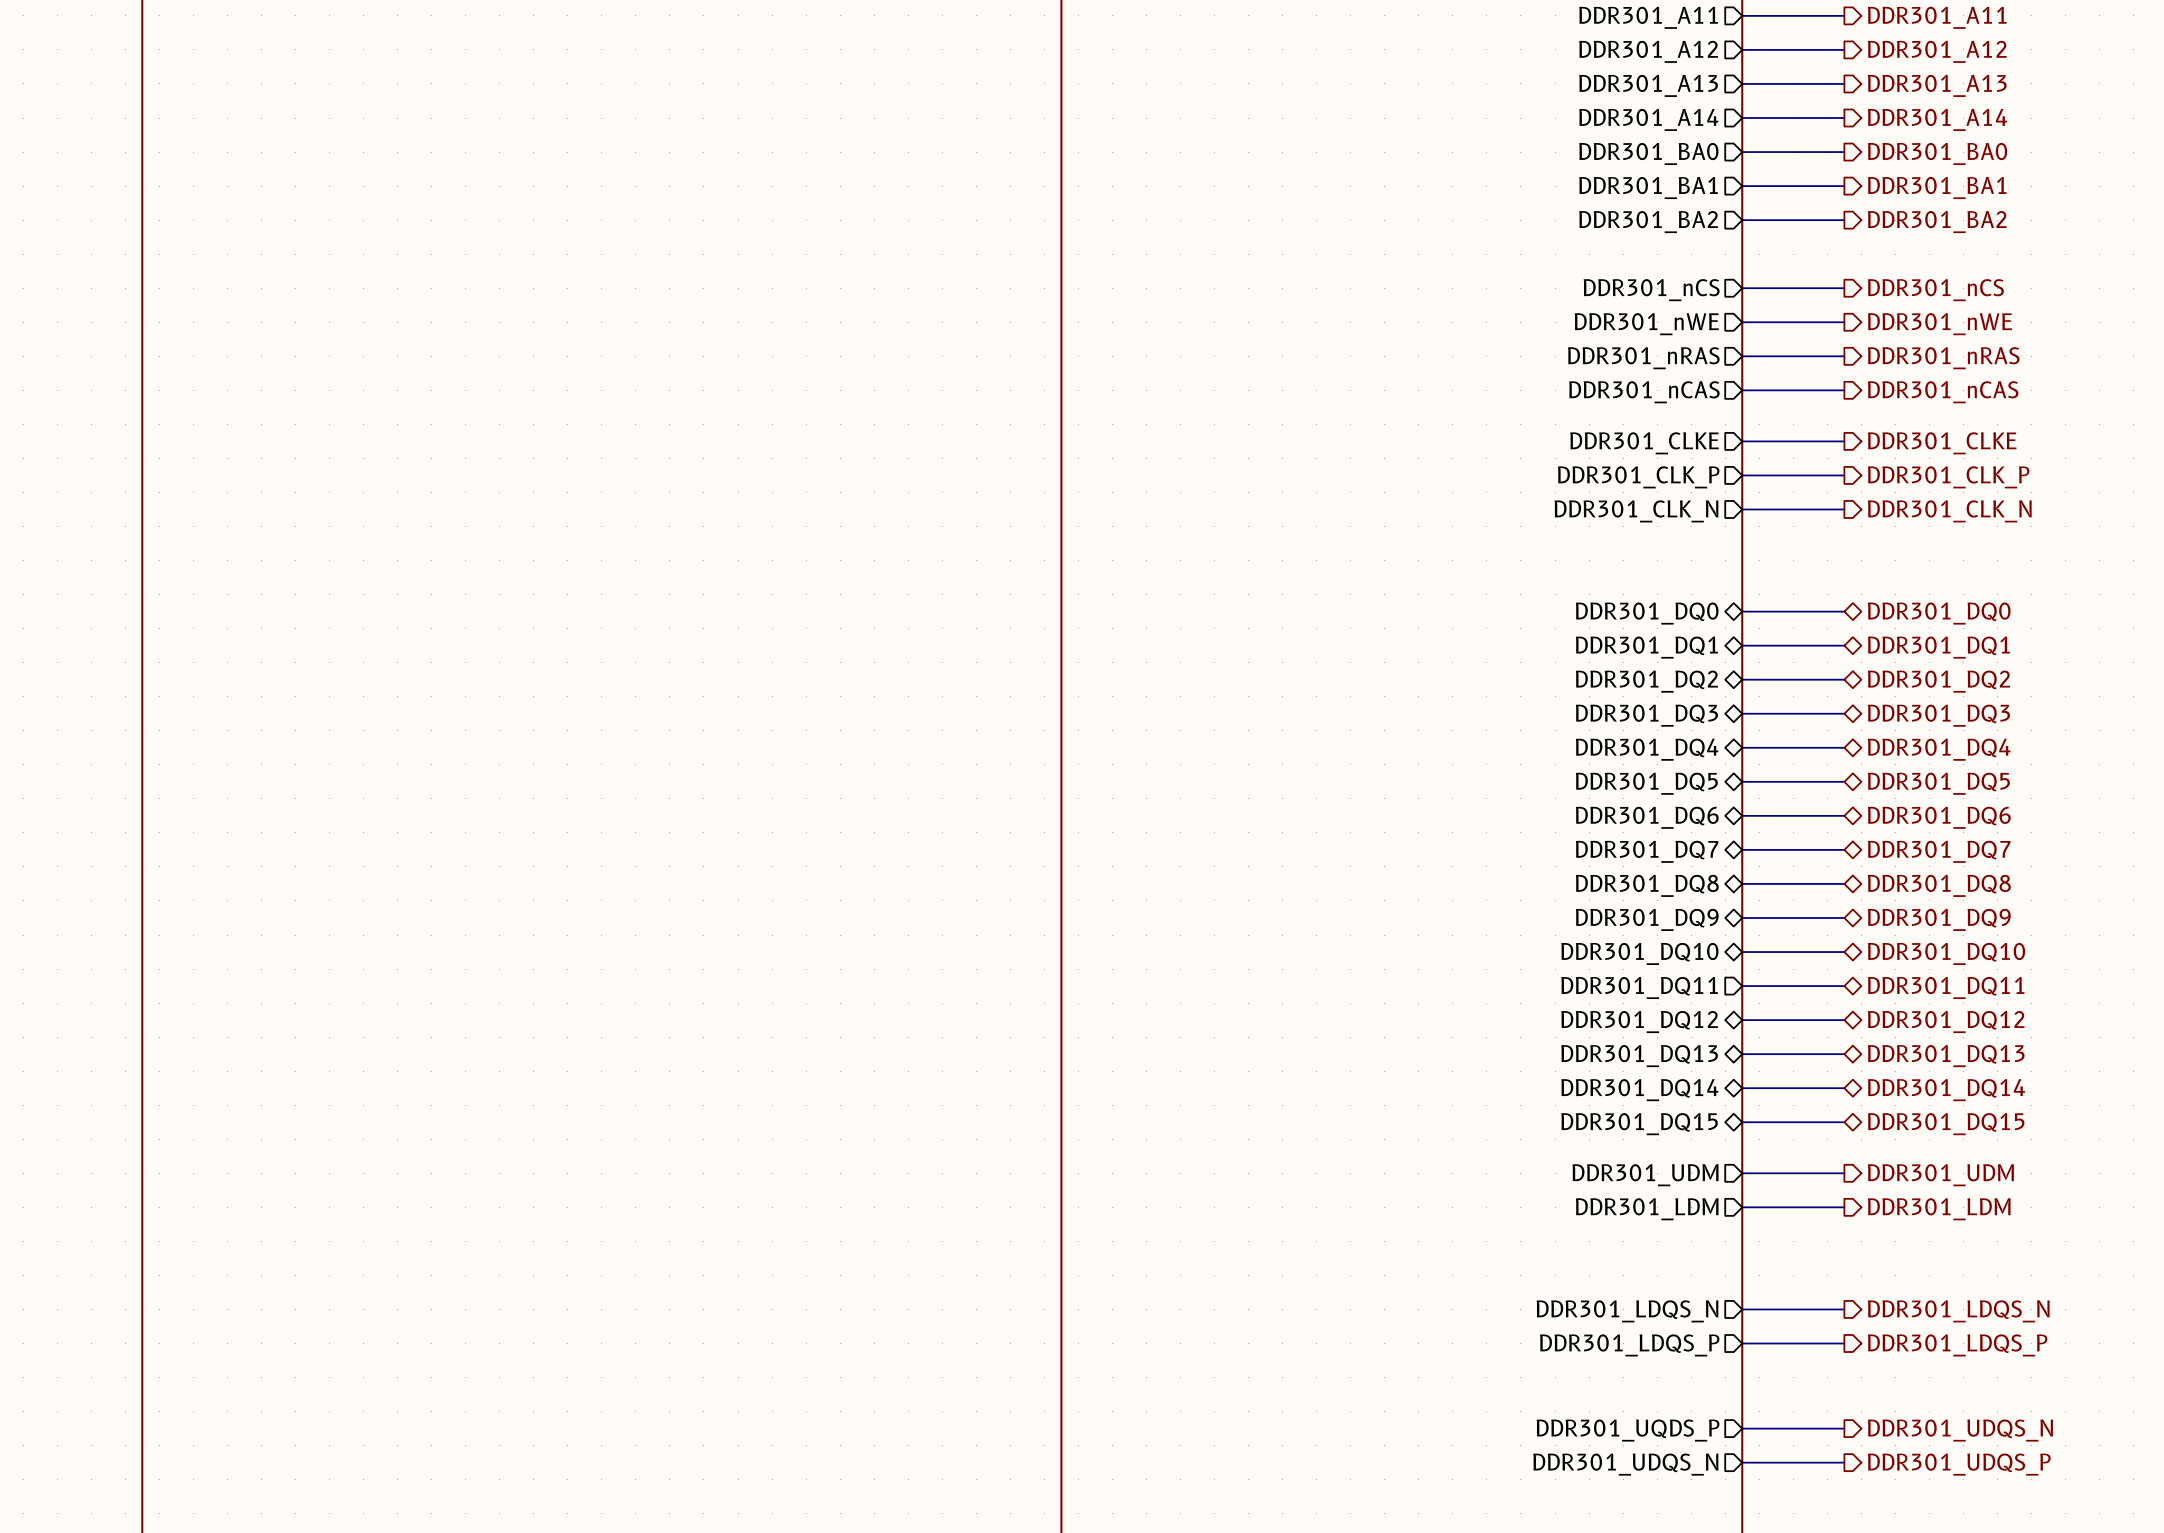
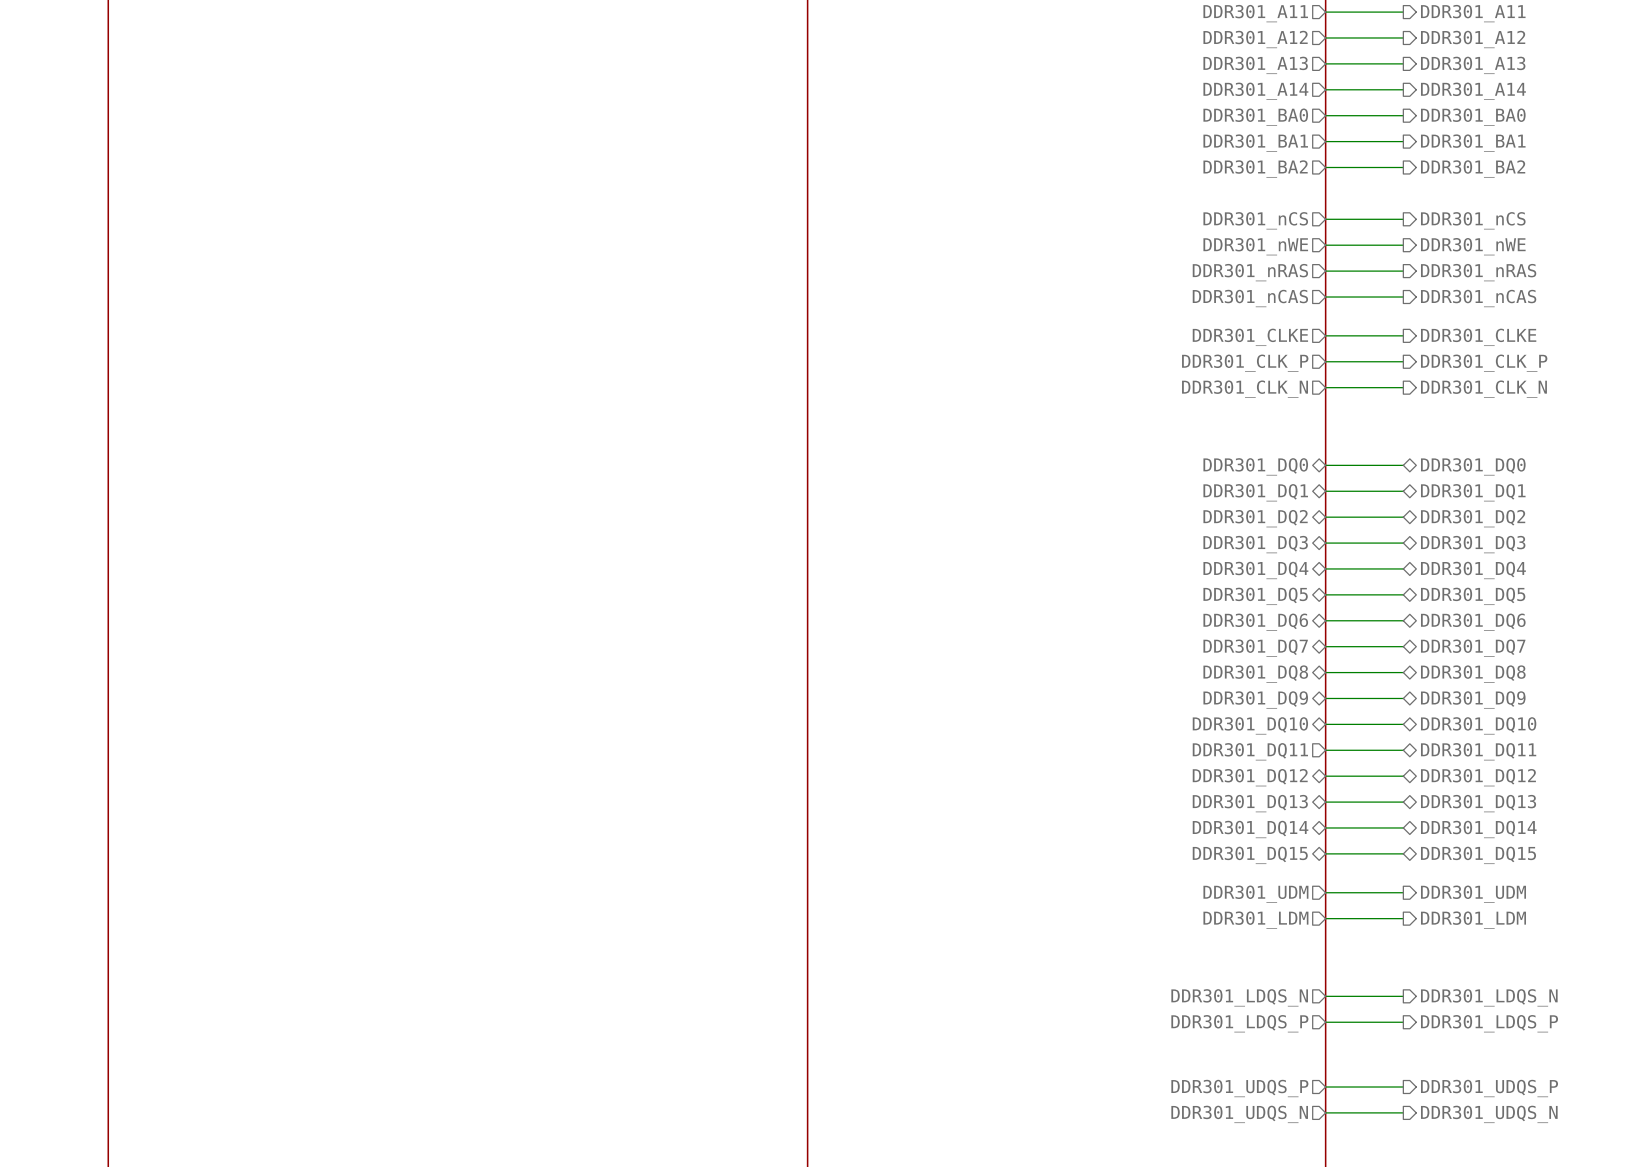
sheet pin: DDR301_UQDS_P (1628, 1430) -> DDR301_UDQS_P (1239, 1088)
hierarchical label: DDR301_UDQS_N (1960, 1430) -> DDR301_UDQS_P (1489, 1088)
hierarchical label: DDR301_UDQS_P (1959, 1464) -> DDR301_UDQS_N (1489, 1114)

